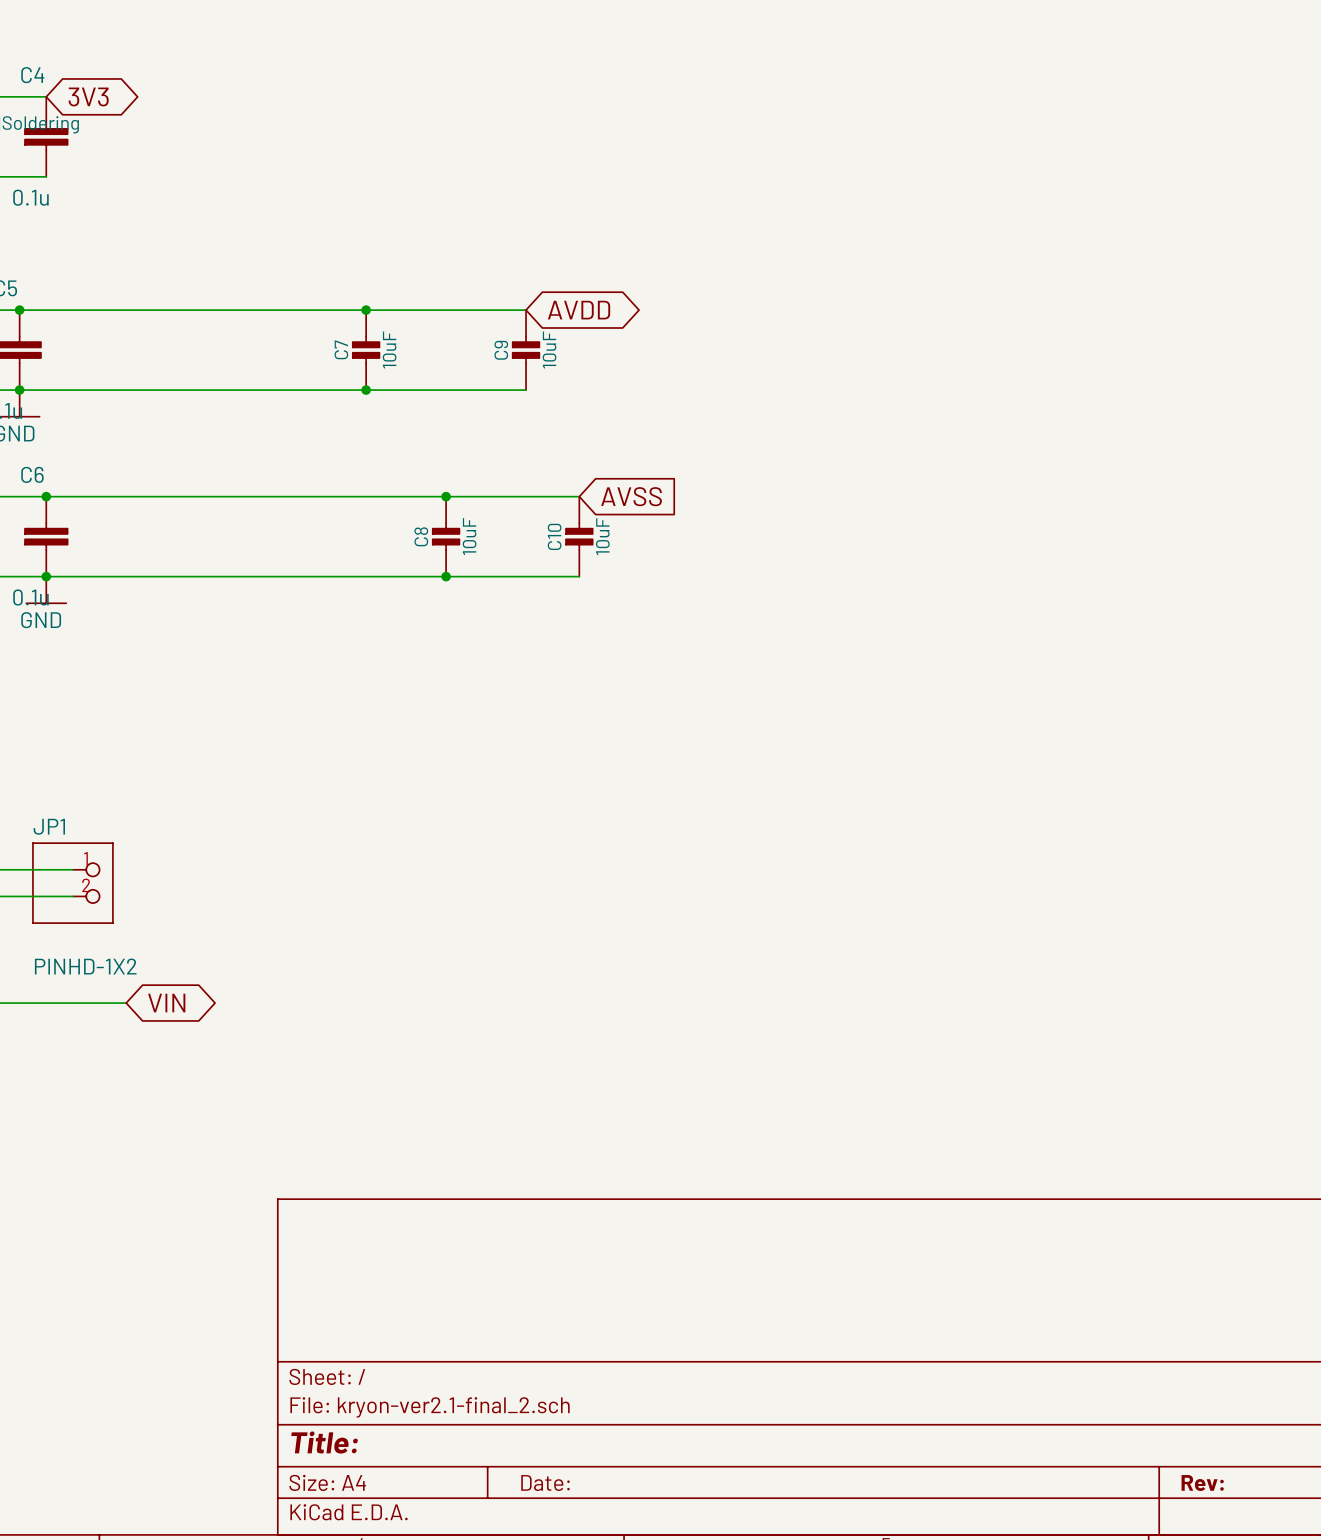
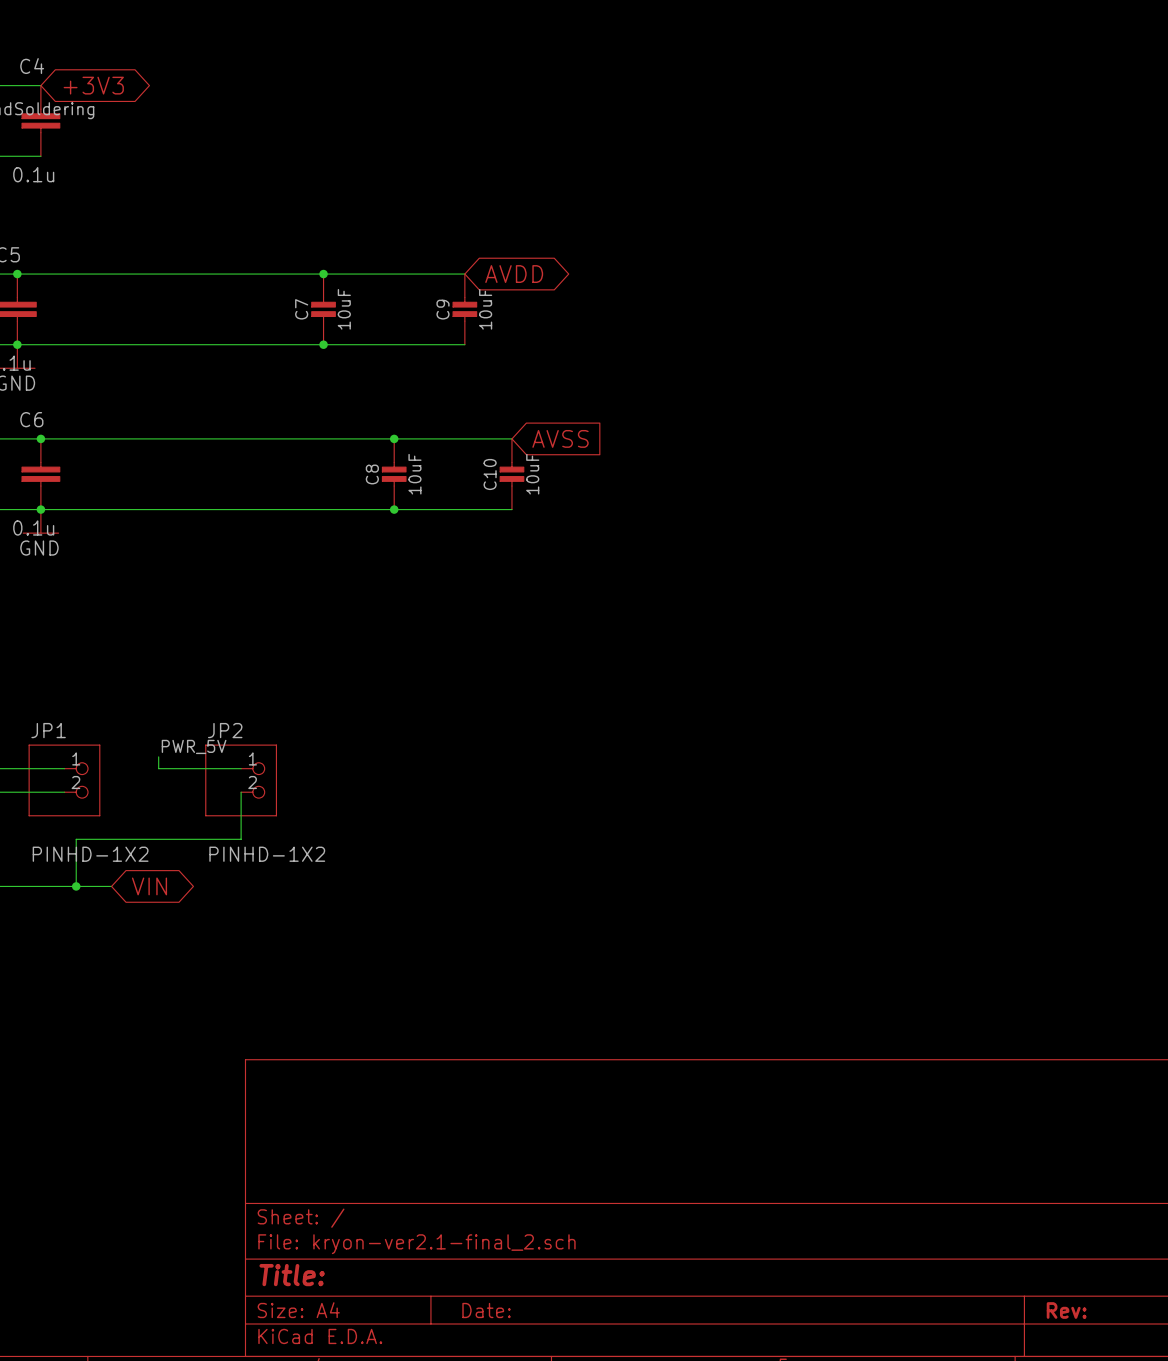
global label: 3V3 (88, 96) -> +3V3 (93, 85)
label: none -> PWR_5V (194, 746)
wire: none -> (158, 756) (158, 768) (241, 768)
JP2: none -> PINHD-1X2 (241, 780)
wire: none -> (241, 792) (241, 839) (76, 839) (76, 886)
junction: none -> (76, 886)

